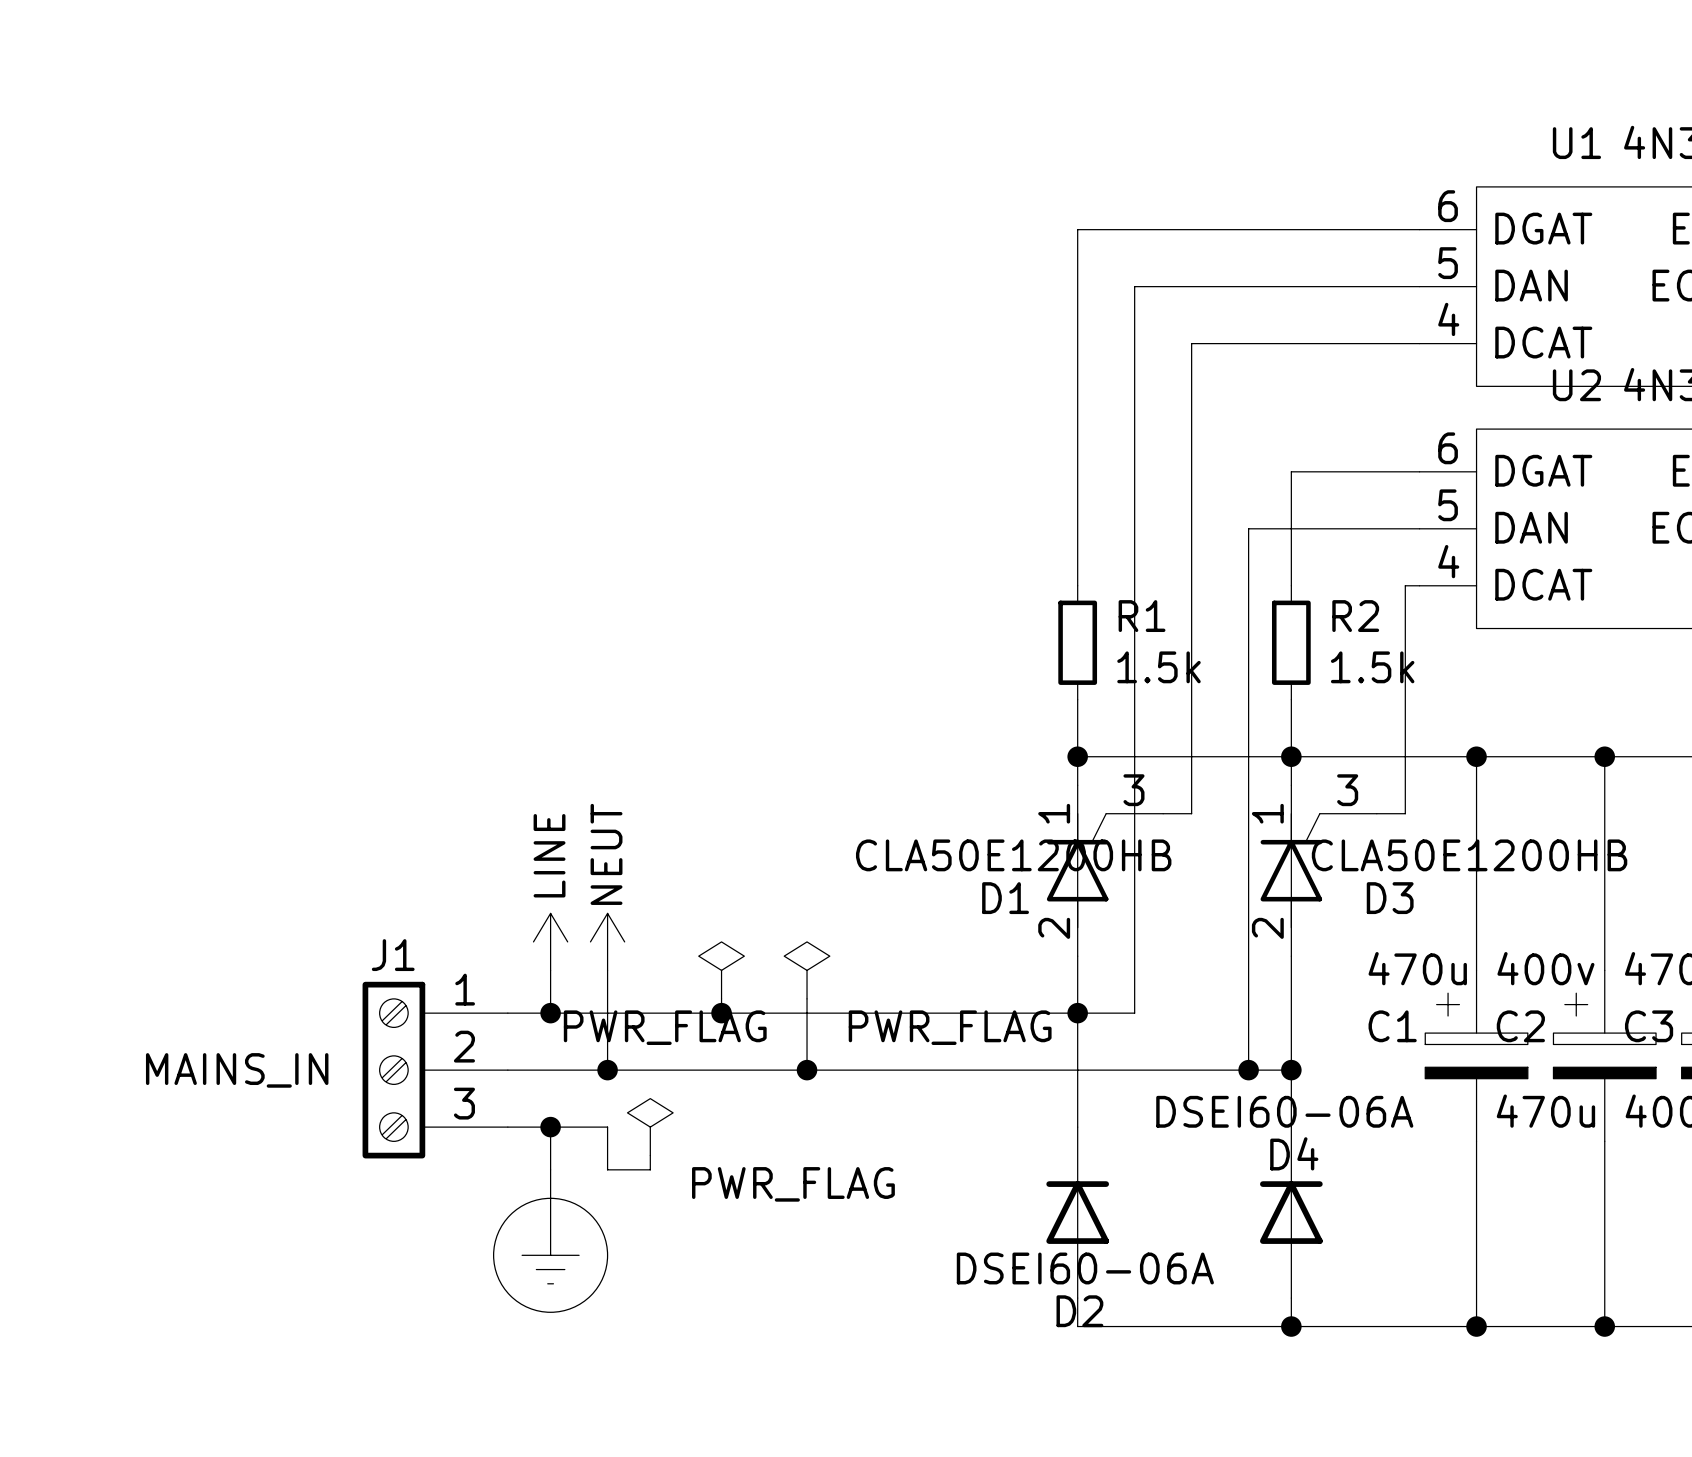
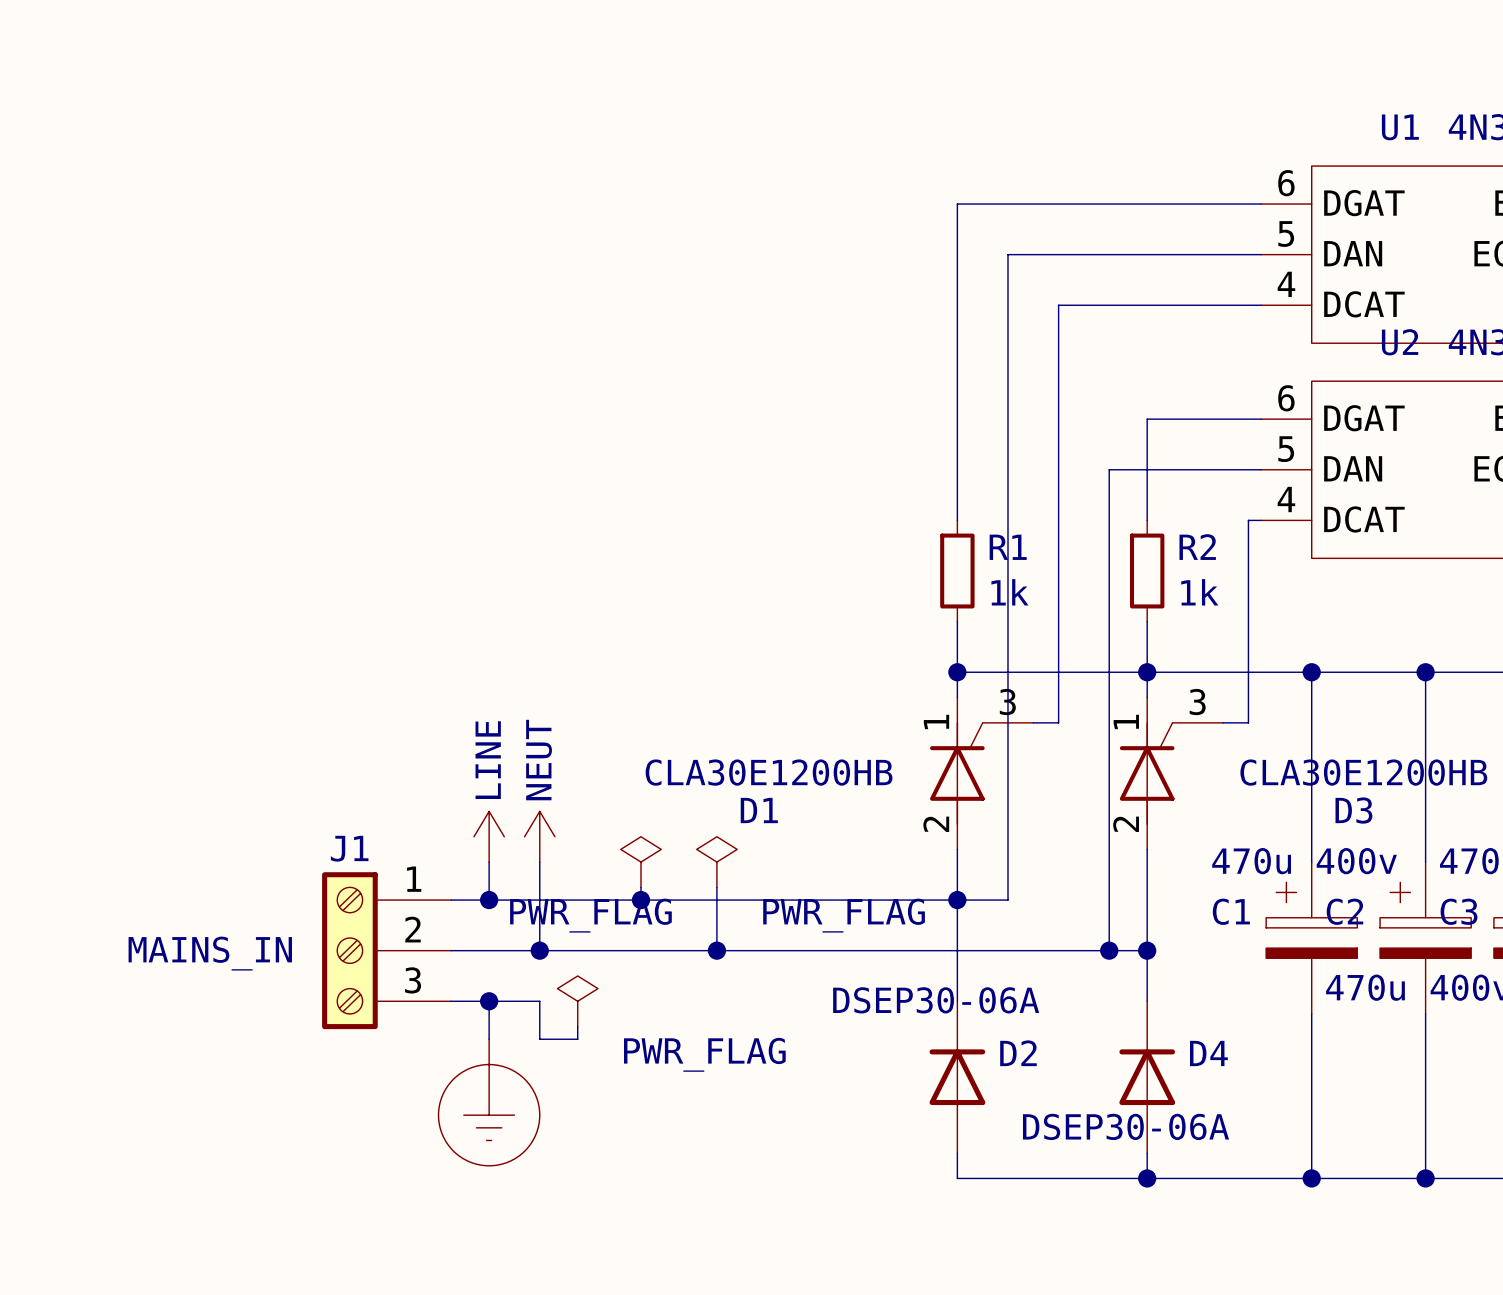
R1 value: 1.5k (1158, 667) -> 1k (1009, 592)
R2 value: 1.5k (1372, 667) -> 1k (1199, 592)
D1 value: CLA50E1200HB (1013, 855) -> CLA30E1200HB (769, 772)
D3 value: CLA50E1200HB (1469, 855) -> CLA30E1200HB (1363, 772)
D1 name position: D1 (1005, 898) -> D1 (759, 810)
D3 name position: D3 (1390, 898) -> D3 (1353, 810)
D4 value: DSEI60-06A (1284, 1111) -> DSEP30-06A (1126, 1126)
D4 name position: D4 (1294, 1153) -> D4 (1208, 1053)
D2 value: DSEI60-06A (1085, 1268) -> DSEP30-06A (936, 1000)
D2 name position: D2 (1079, 1311) -> D2 (1018, 1053)

